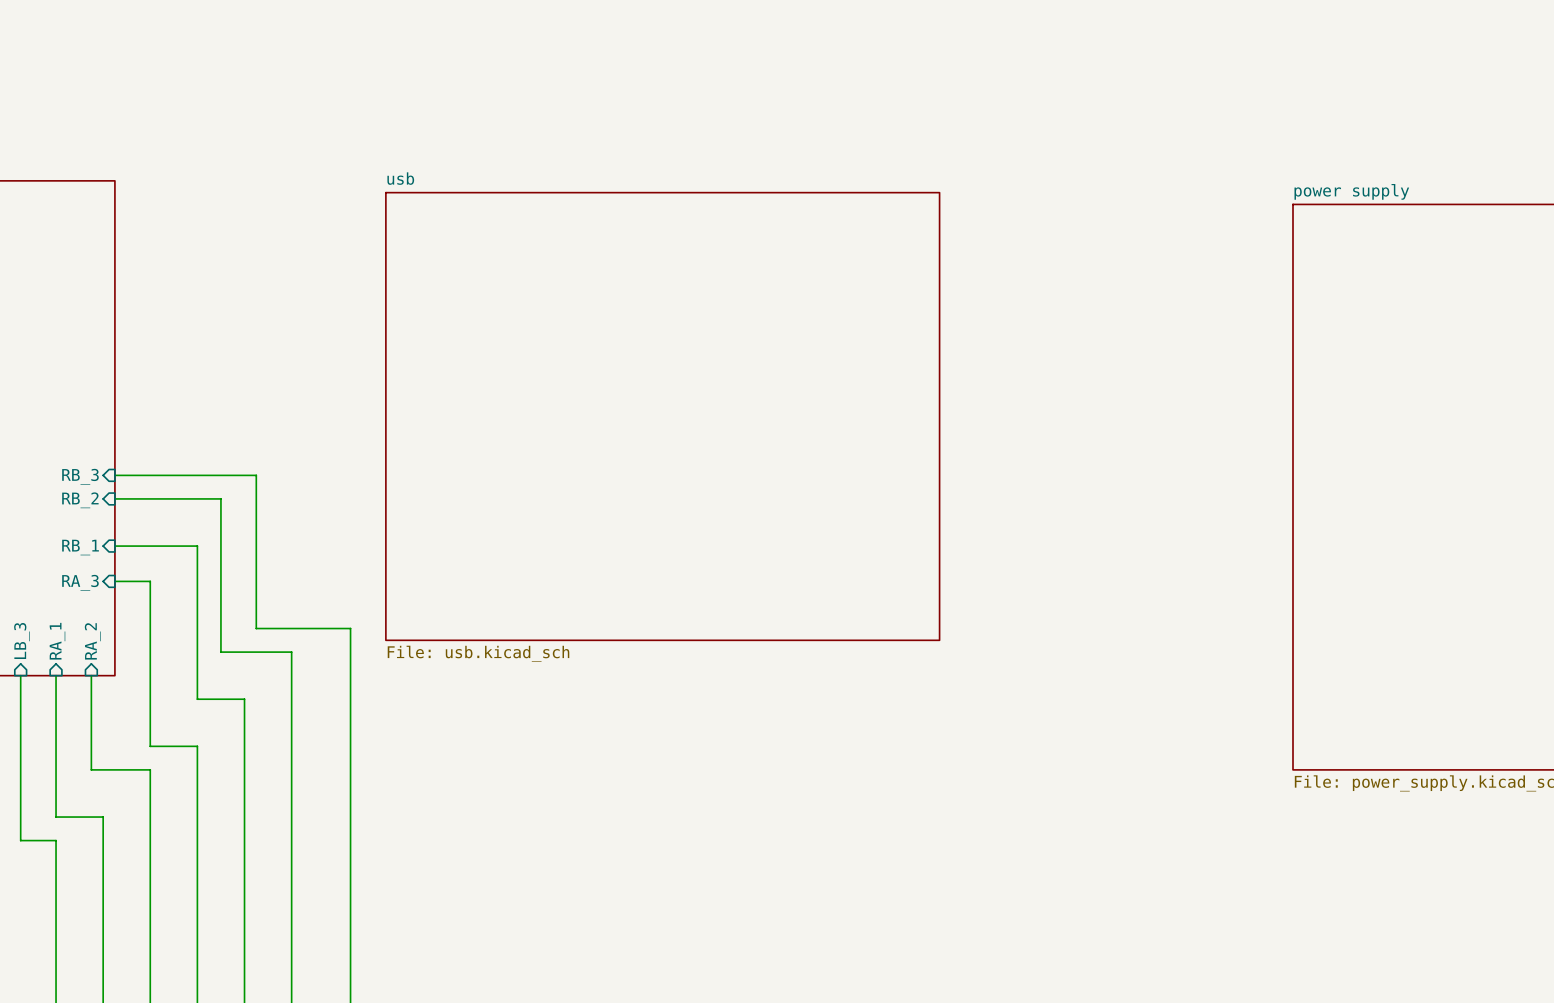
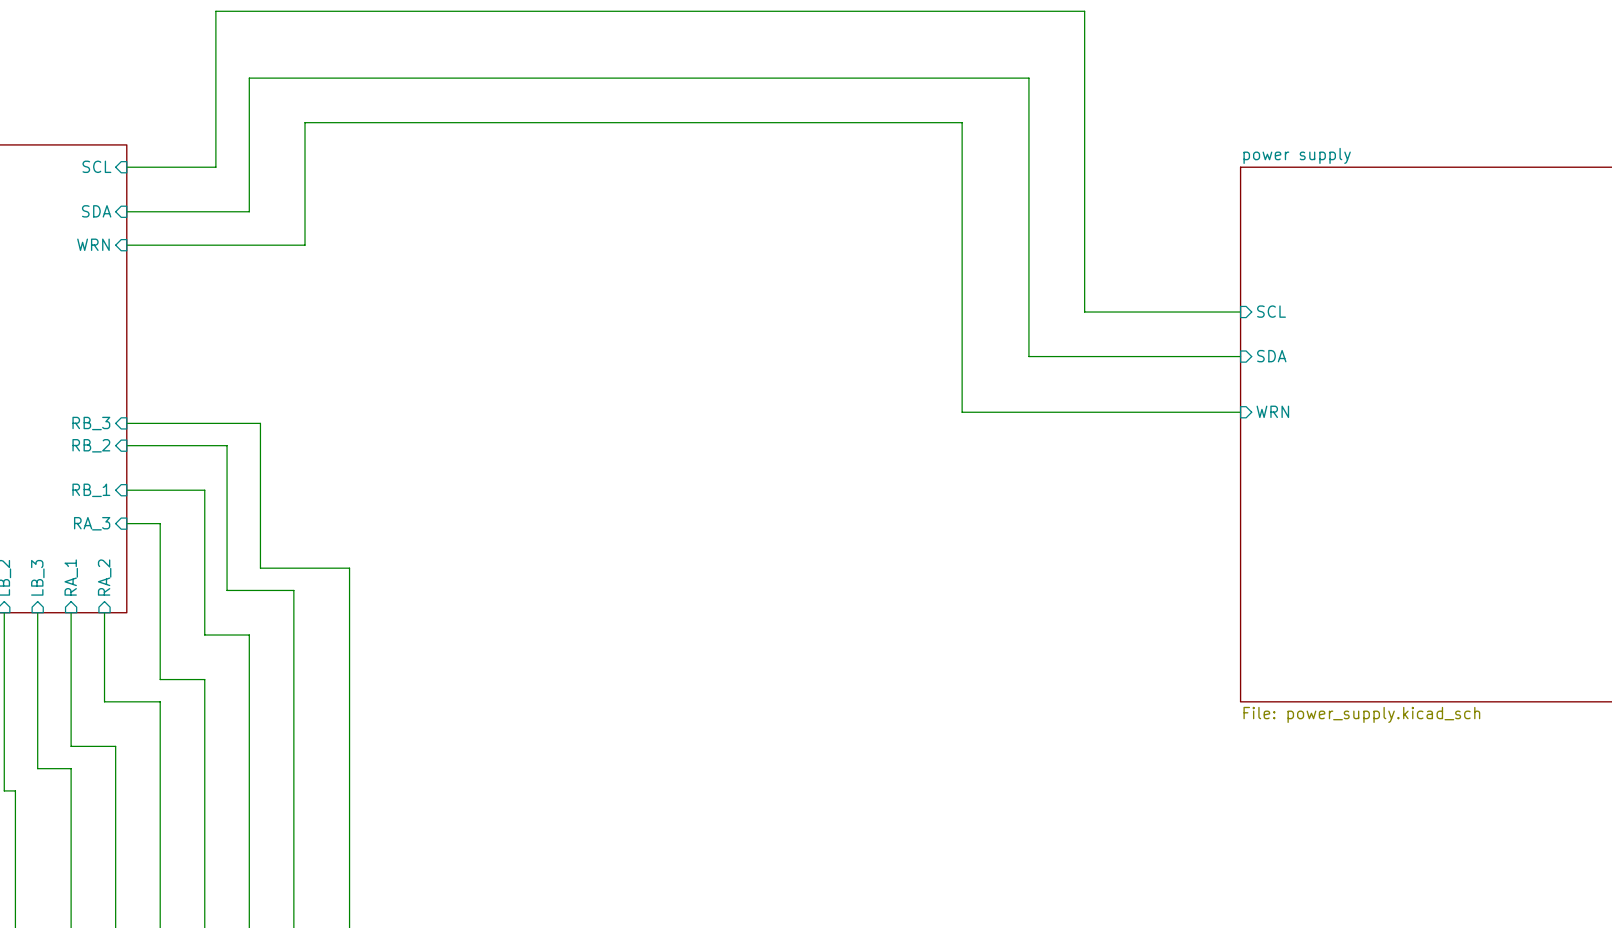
sheet pin: none -> SCL (96, 166)
wire: none -> (126, 167) (215, 167) (215, 11) (1084, 11) (1084, 312) (1240, 312)
sheet pin: none -> SDA (96, 211)
wire: none -> (126, 211) (249, 211) (249, 78) (1028, 78) (1028, 356) (1240, 356)
sheet pin: none -> WRN (93, 244)
wire: none -> (126, 245) (305, 245) (305, 122) (962, 122) (962, 412) (1240, 412)
sheet pin: none -> SCL (1271, 311)
sheet pin: none -> SDA (1271, 356)
sheet usb: File: usb.kicad_sch (662, 416) -> none
sheet pin: none -> WRN (1272, 411)

